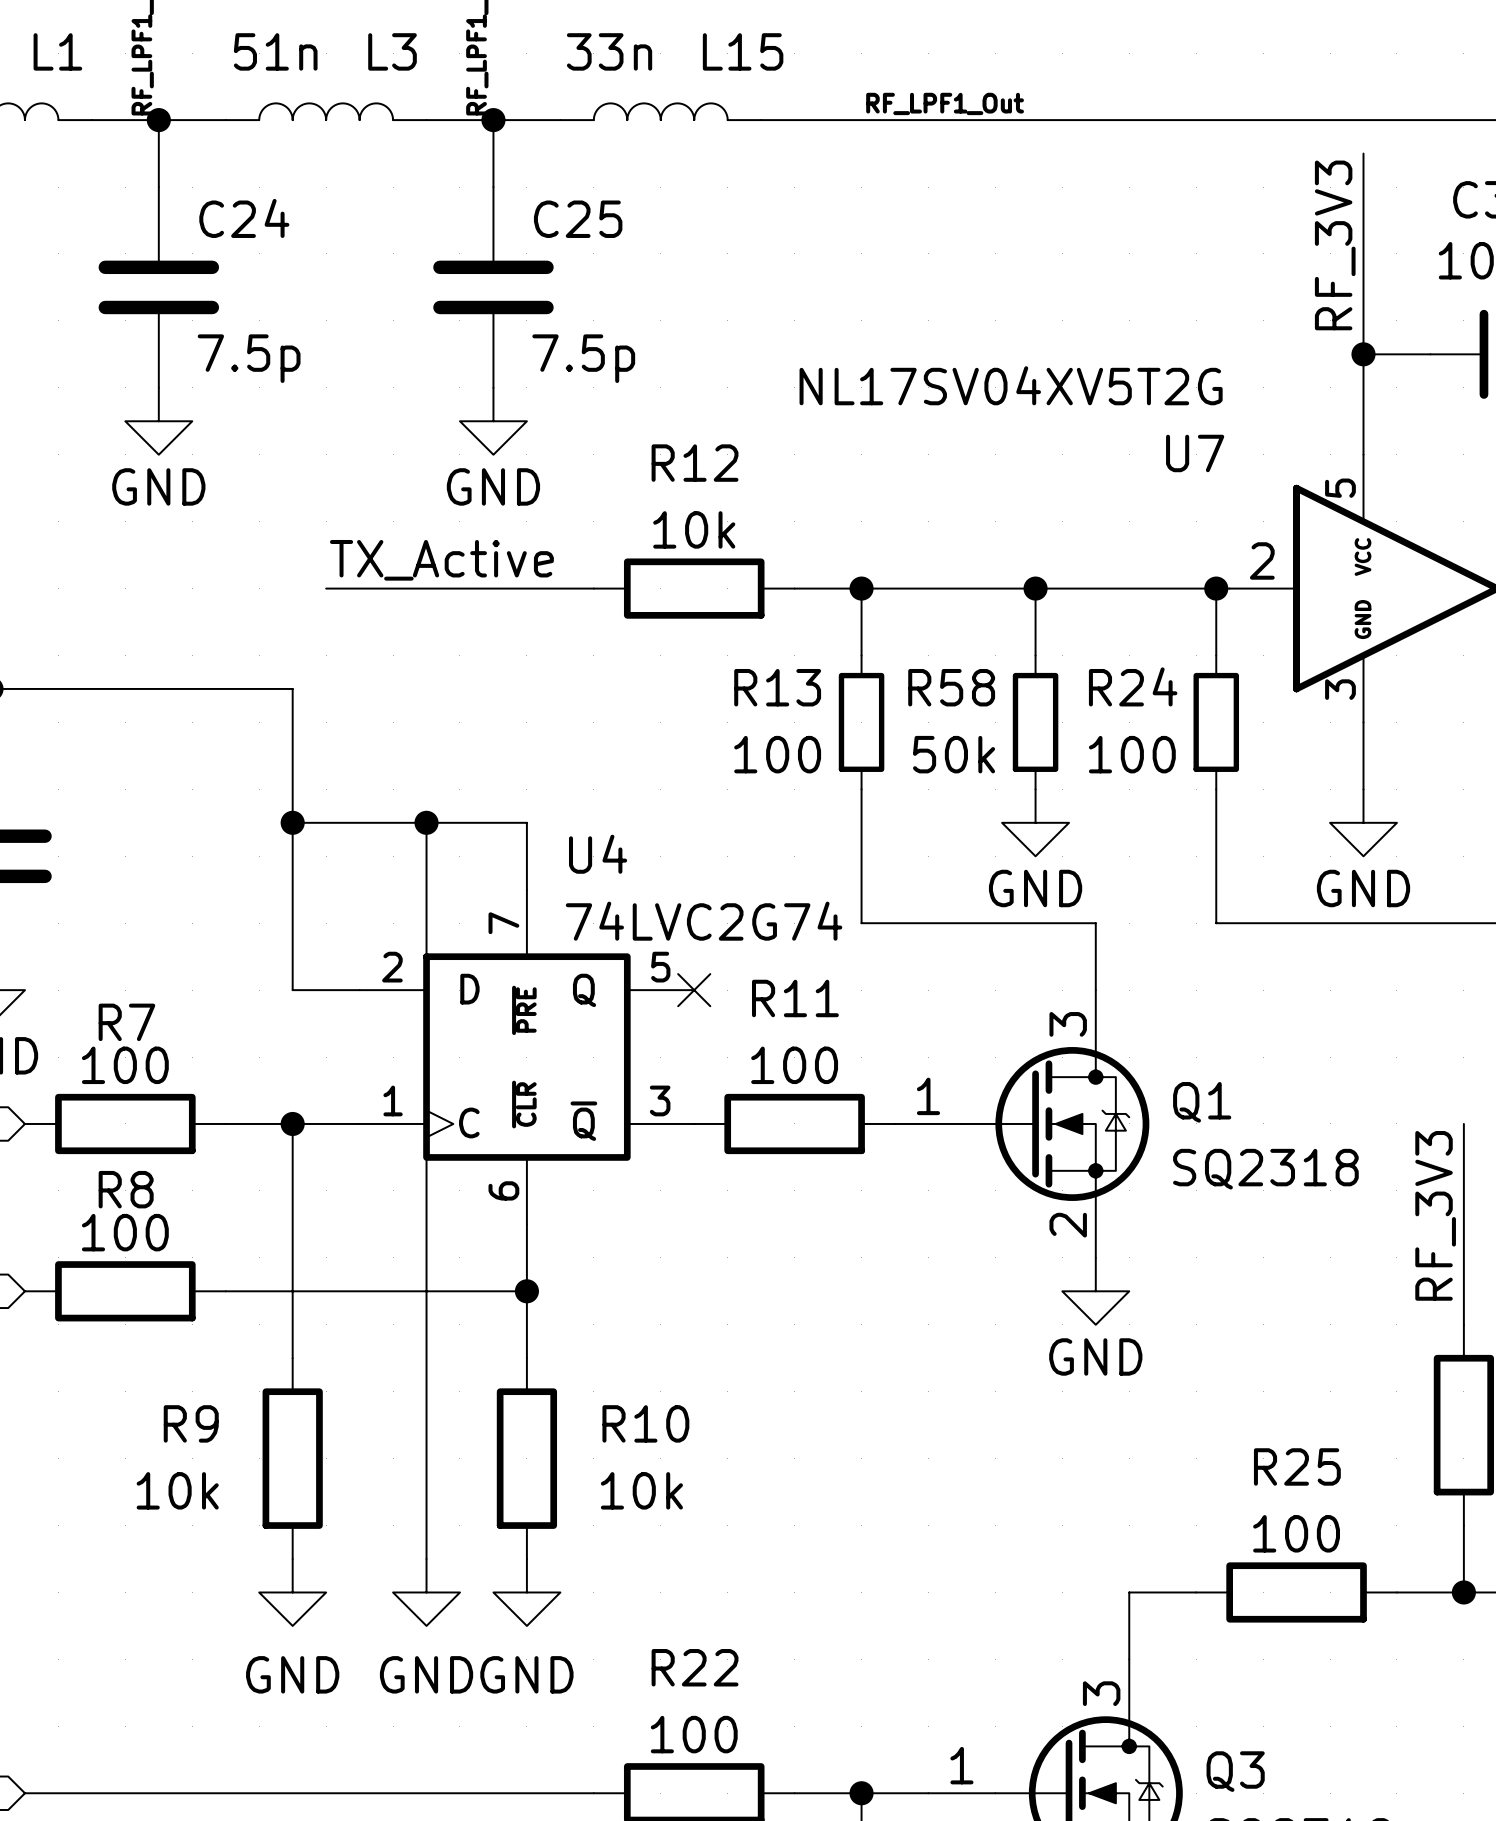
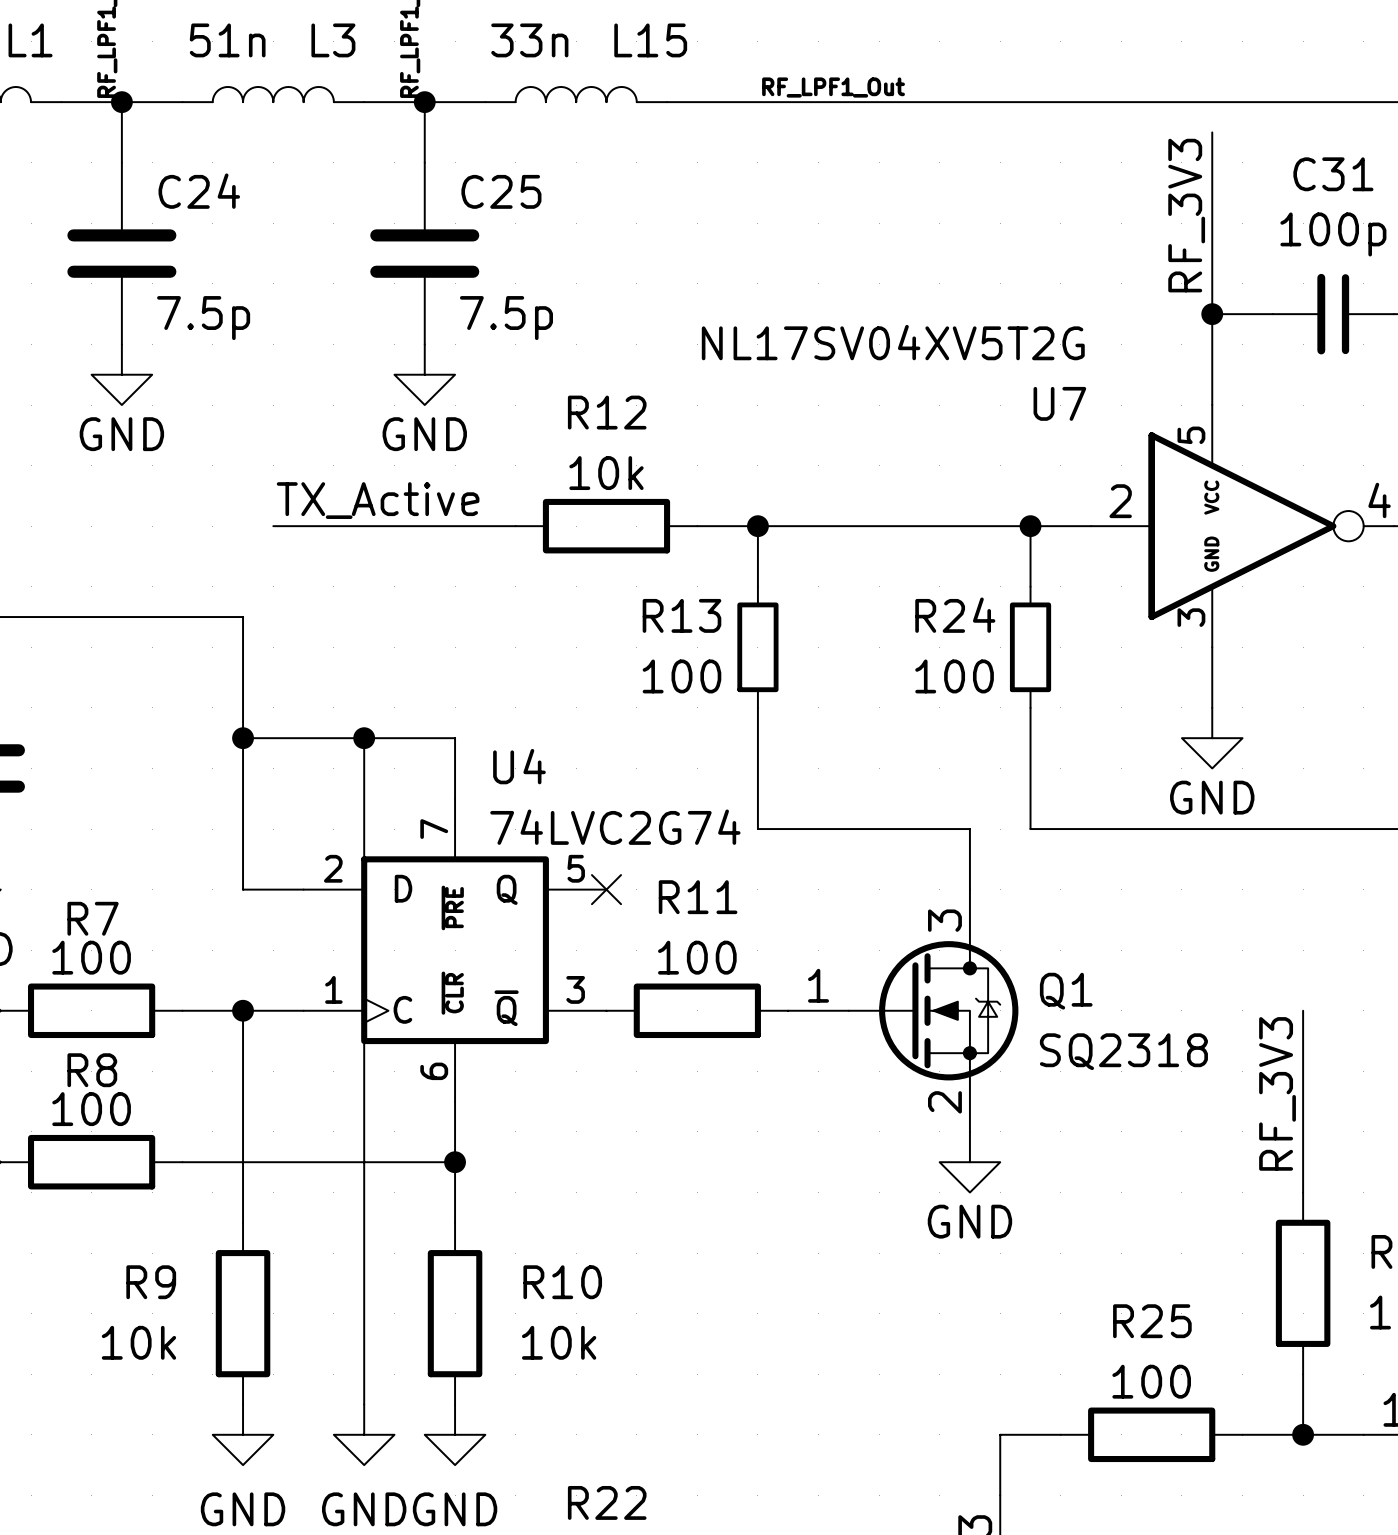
wire: (1035, 588) (1035, 655) -> none
junction: (1035, 588) -> none
wire: (1216, 588) (1216, 655) -> (1030, 526) (1030, 586)
junction position: (1216, 588) -> (1030, 526)
R58: 50k (1035, 722) -> none
R24 position: (1216, 722) -> (1030, 647)
wire: (1216, 789) (1216, 923) -> (1030, 707) (1030, 829) (1078, 829)
power symbol: GND (1035, 822) -> none

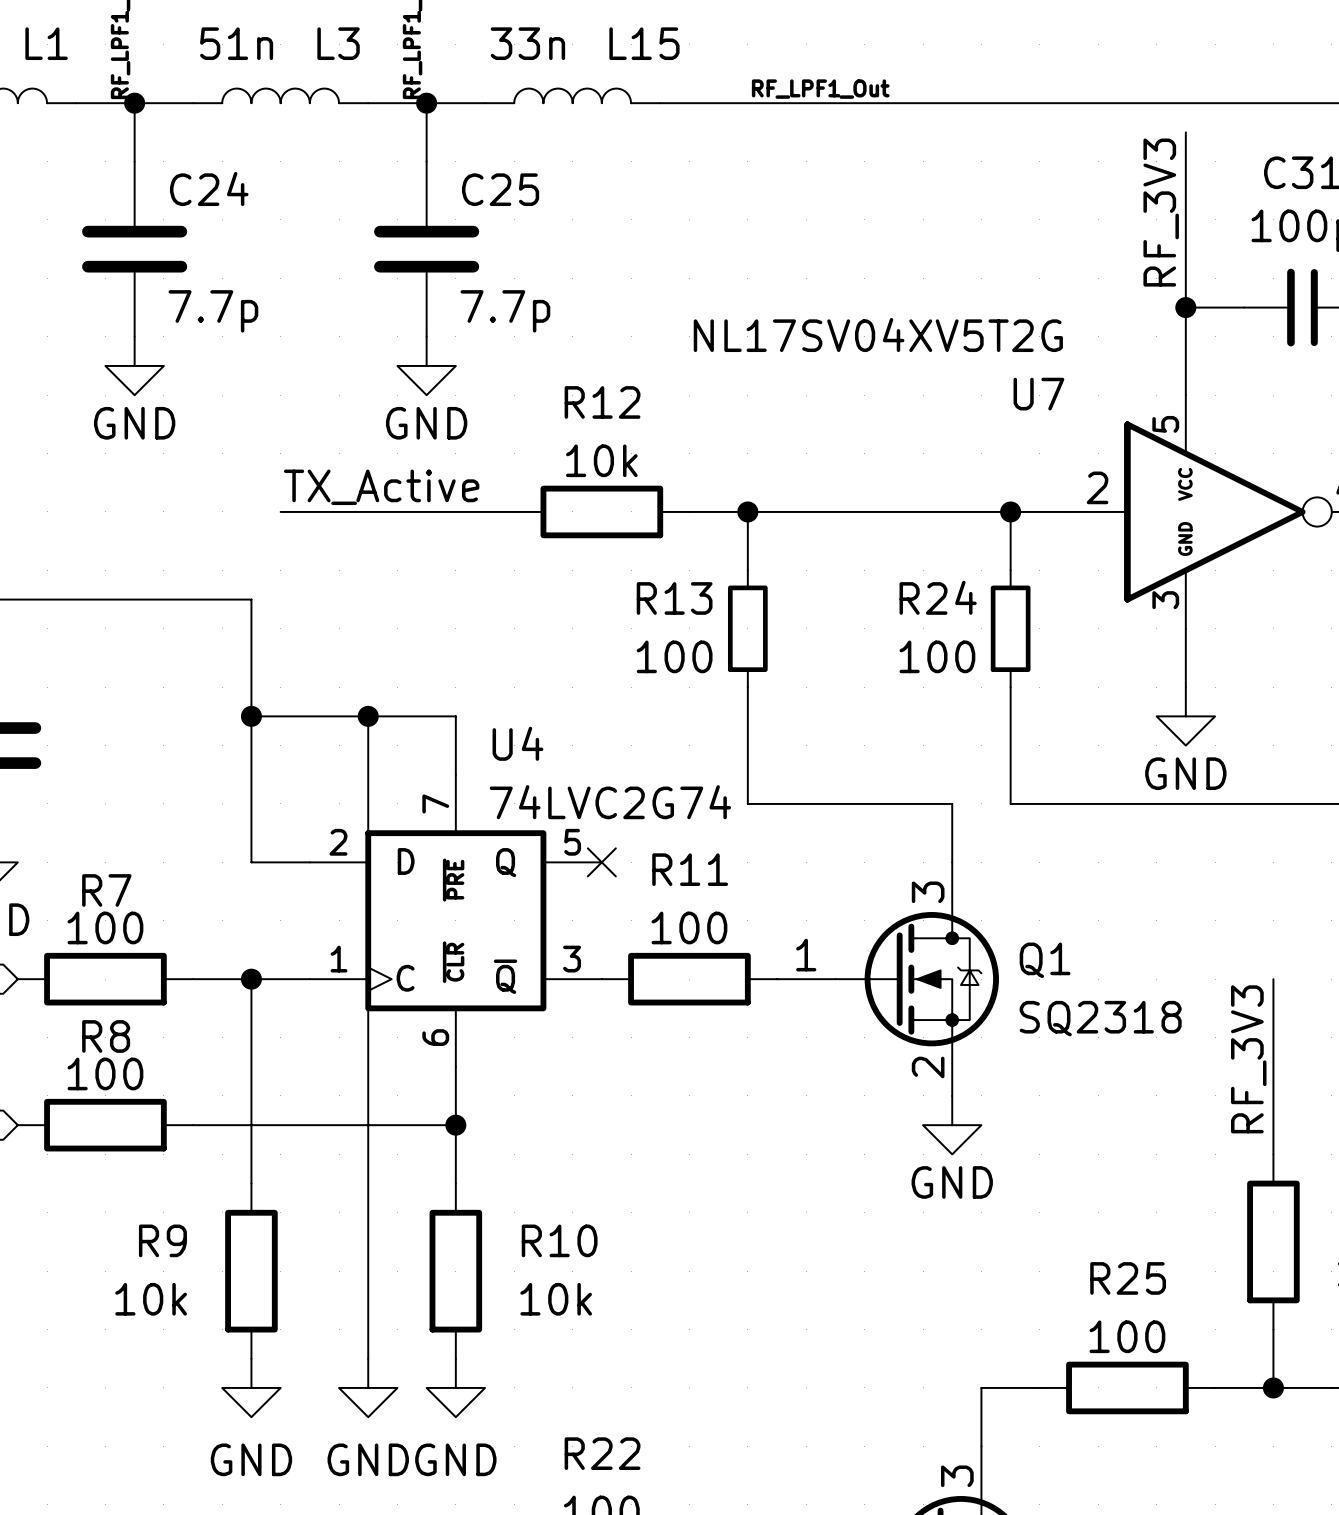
C24 value: 7.5p (203, 318) -> 7.7p (213, 311)
C25 value: 7.5p (506, 318) -> 7.7p (505, 311)

